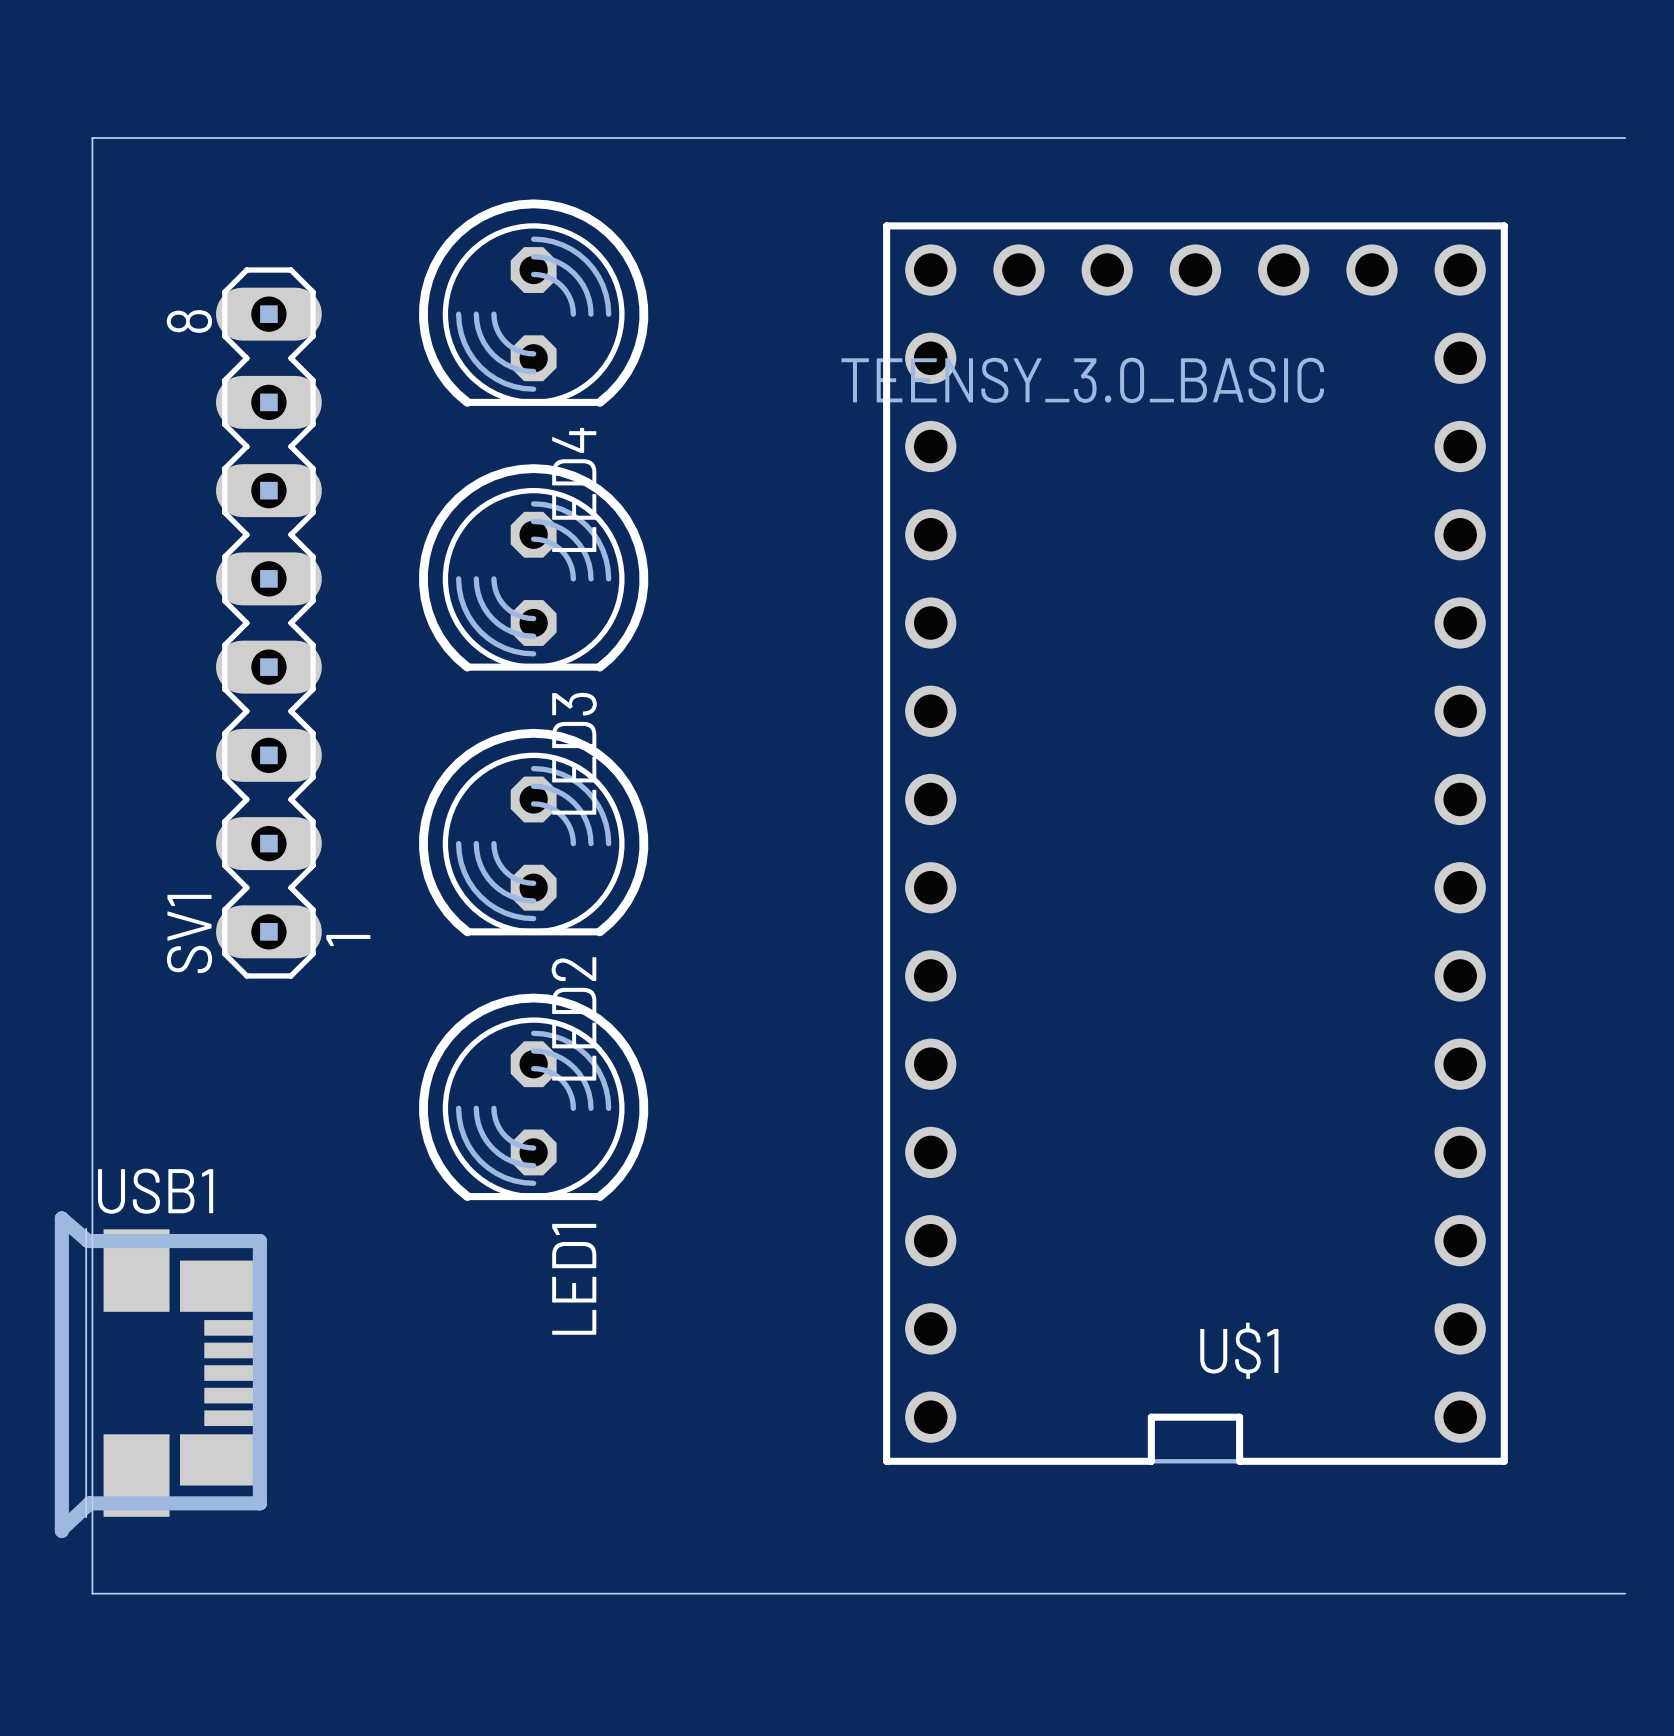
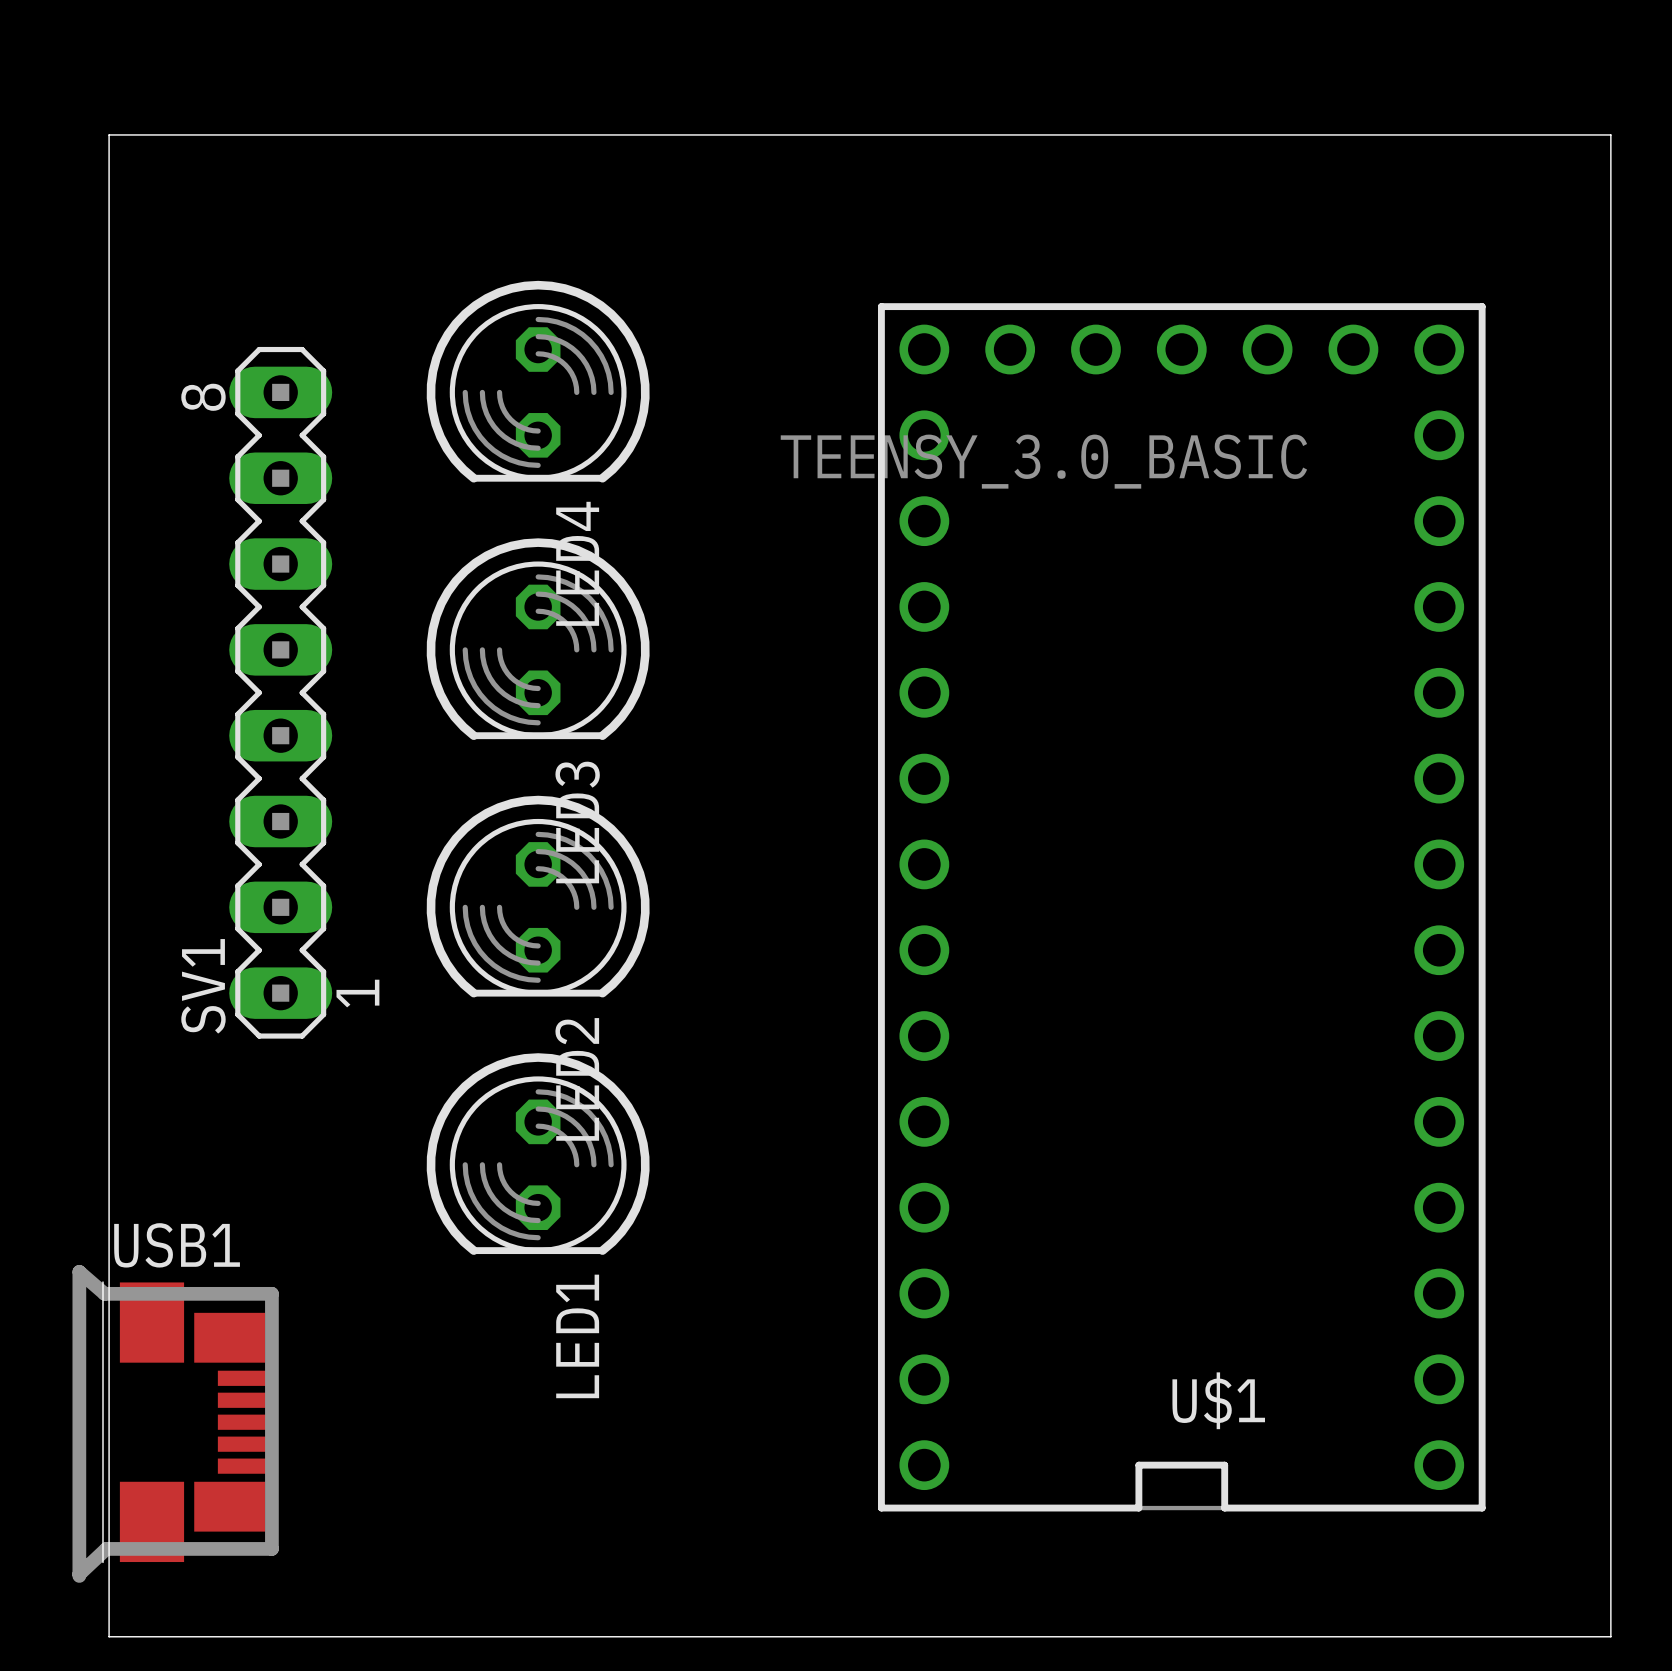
board edge: (92, 138) (1625, 138) -> (109, 221) (109, 134) (1610, 134) (1610, 1636) (1599, 1636)

